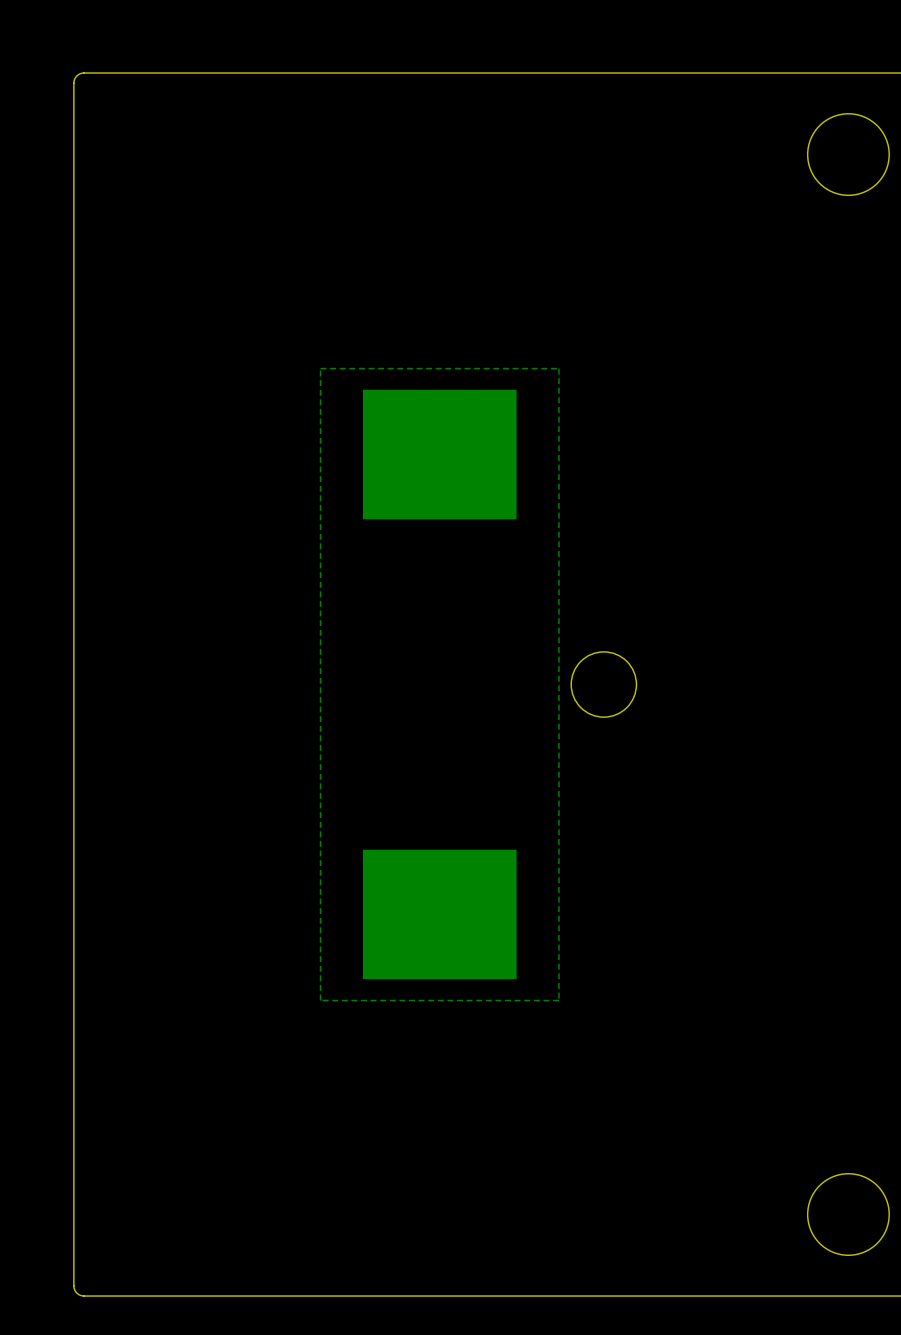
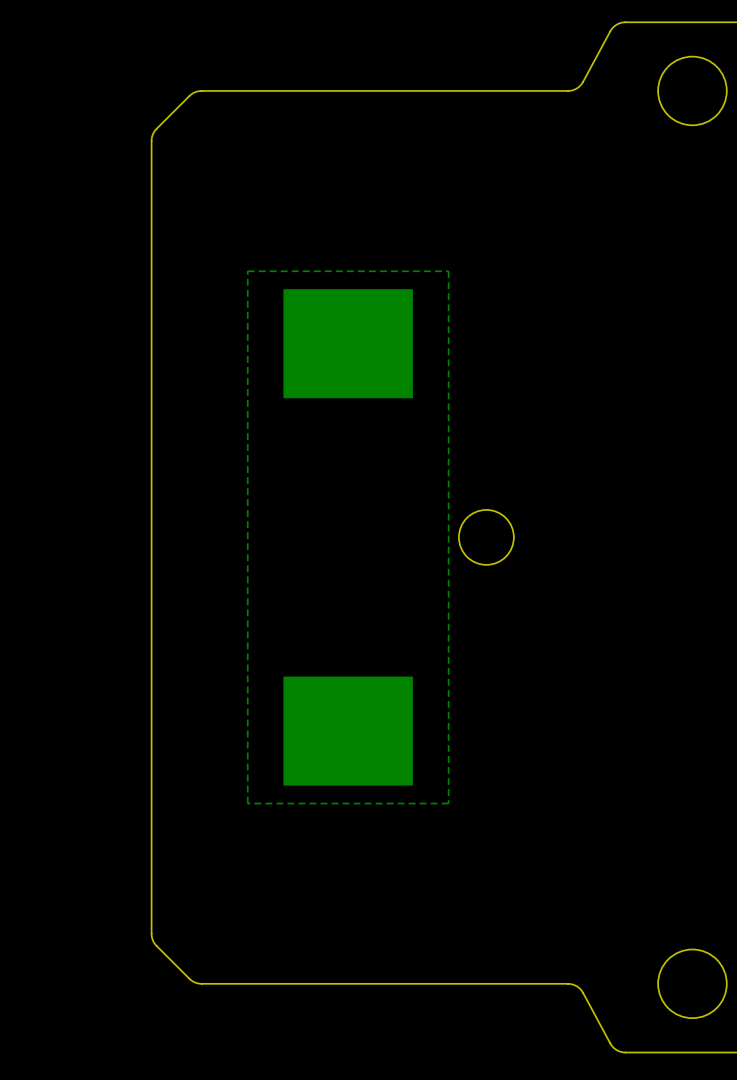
board edge: (768, 73) (84, 73) (76, 75) (73, 83) (75, 1290) (84, 1296) (768, 1296) -> (625, 22) (618, 23) (612, 28) (582, 83) (571, 90) (199, 91) (190, 94) (156, 128) (151, 141) (151, 933) (153, 941) (190, 979) (199, 983) (571, 984) (582, 991) (612, 1046) (618, 1050) (625, 1052)

